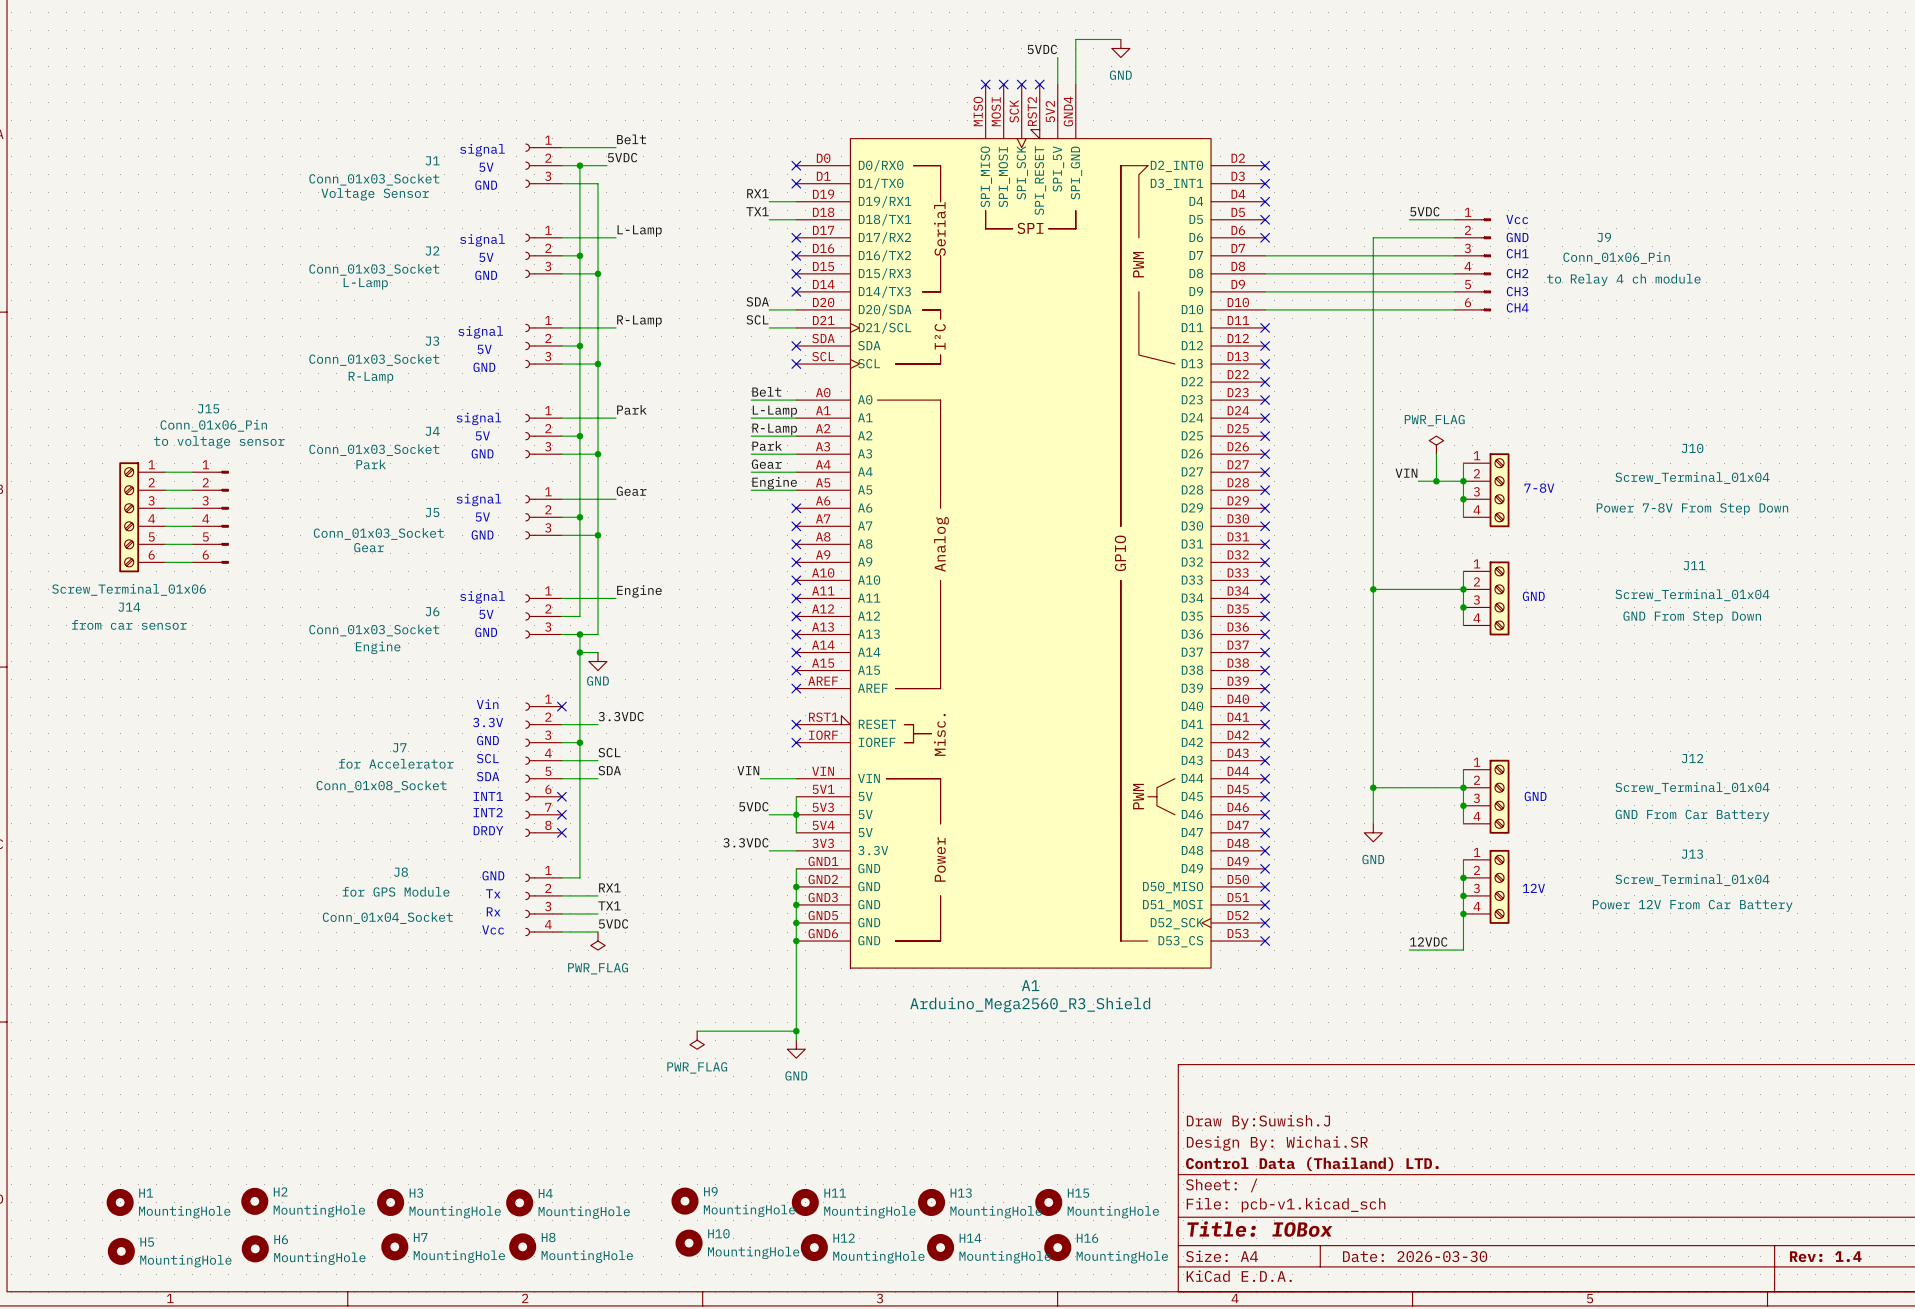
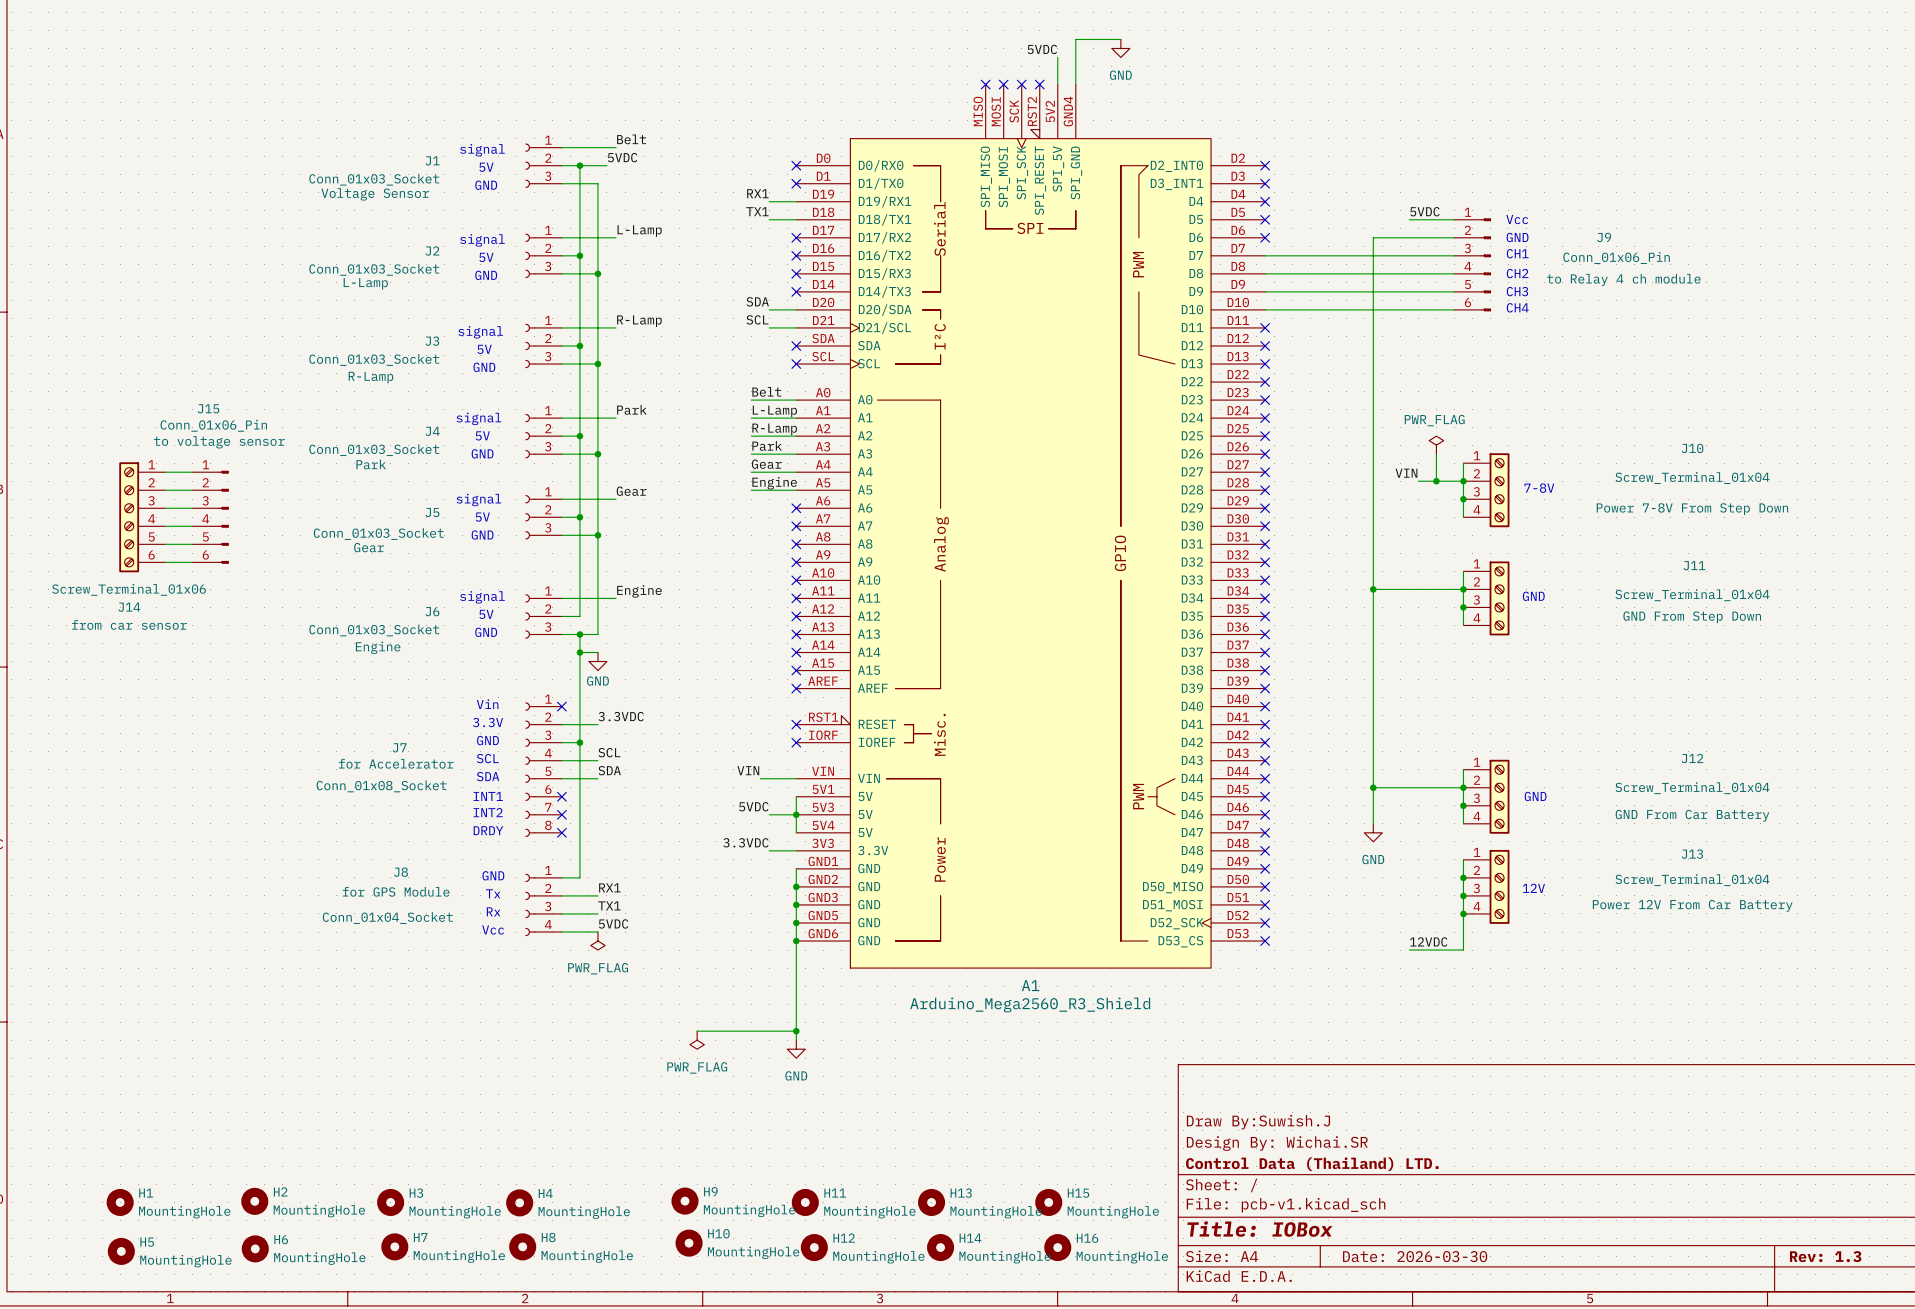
title block: Rev: 1.4 (1825, 1256) -> Rev: 1.3 (1825, 1256)

